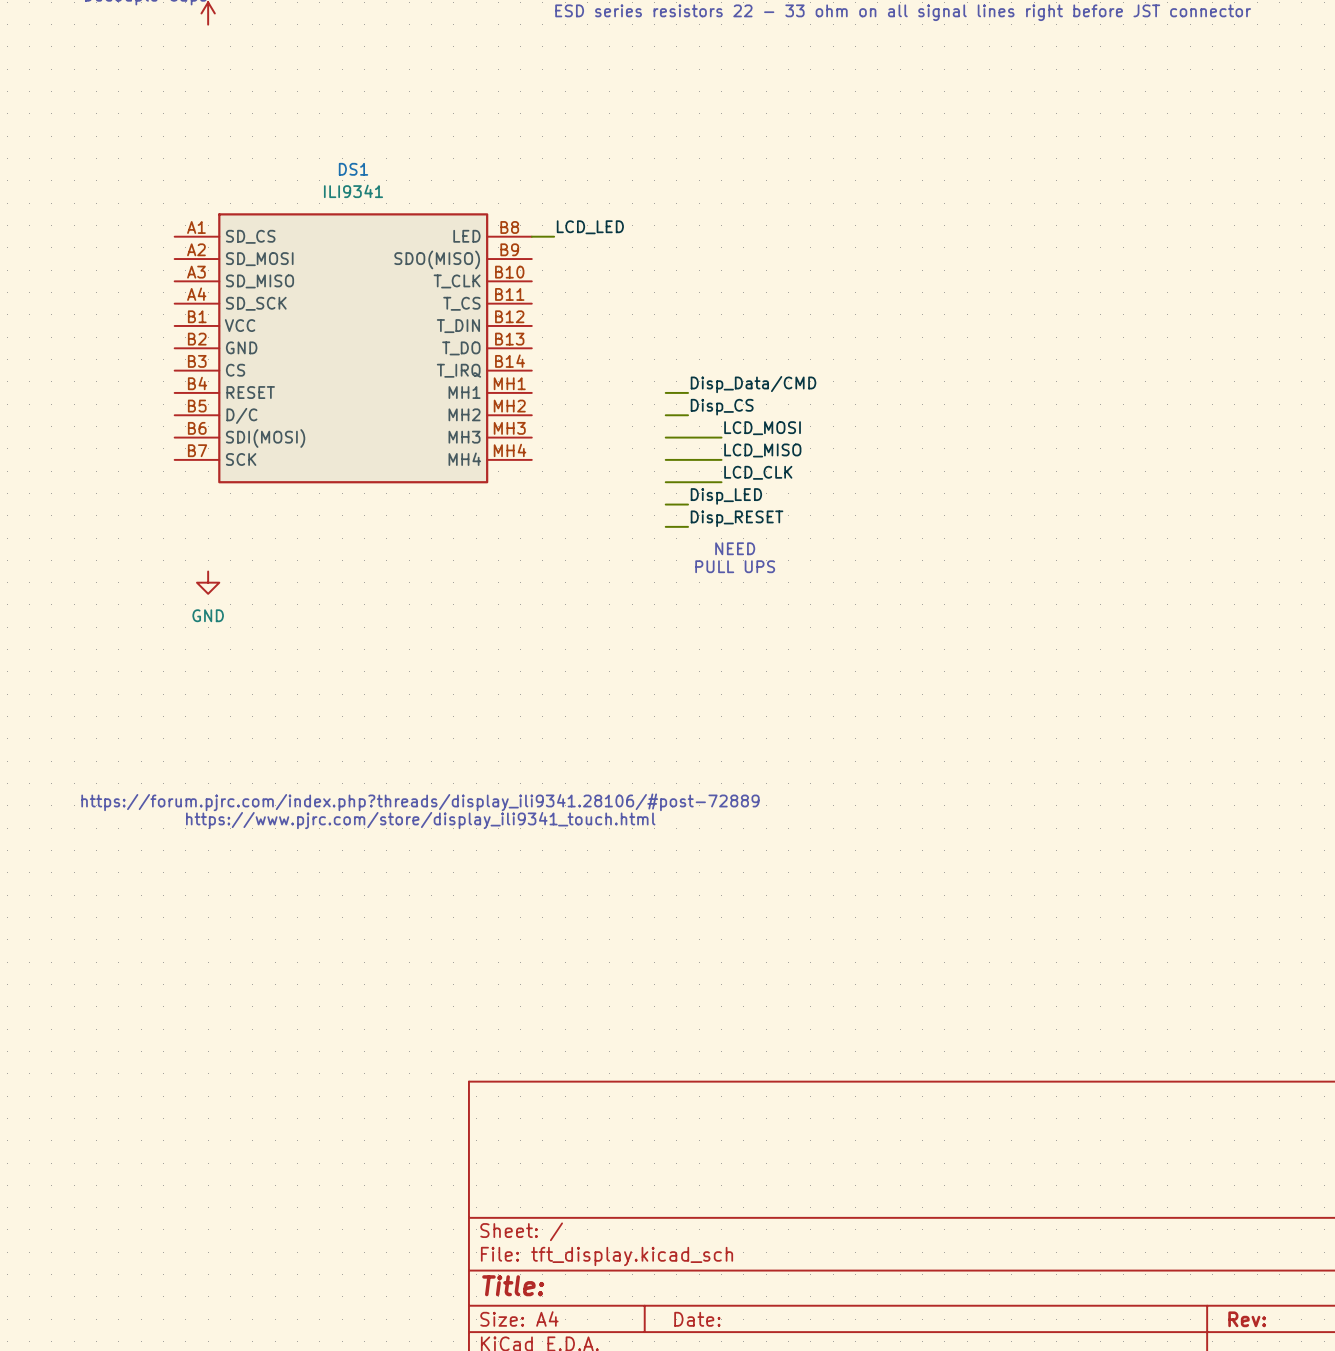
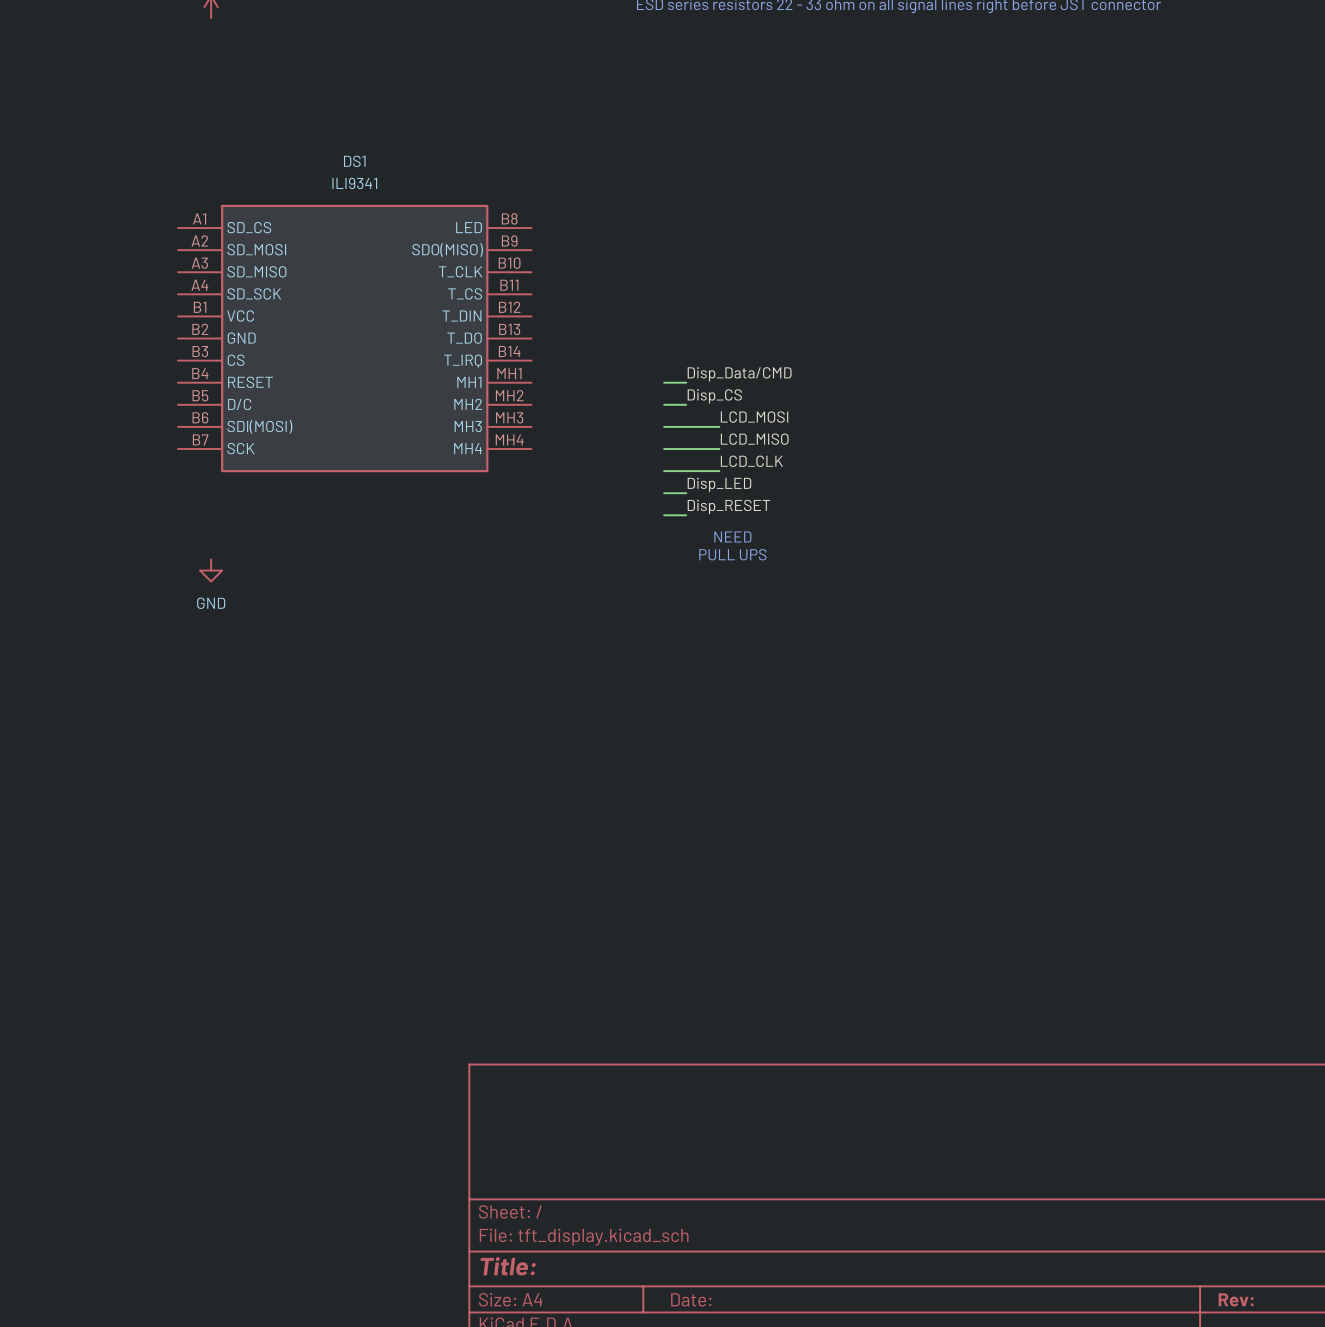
label: LCD_LED (590, 227) -> none
wire: (531, 236) (554, 236) -> none
text: https://forum.pjrc.com/index.php?threads/display_ili9341.28106/#post-72889 (420, 802) -> none
text: https://www.pjrc.com/store/display_ili9341_touch.html (420, 820) -> none

